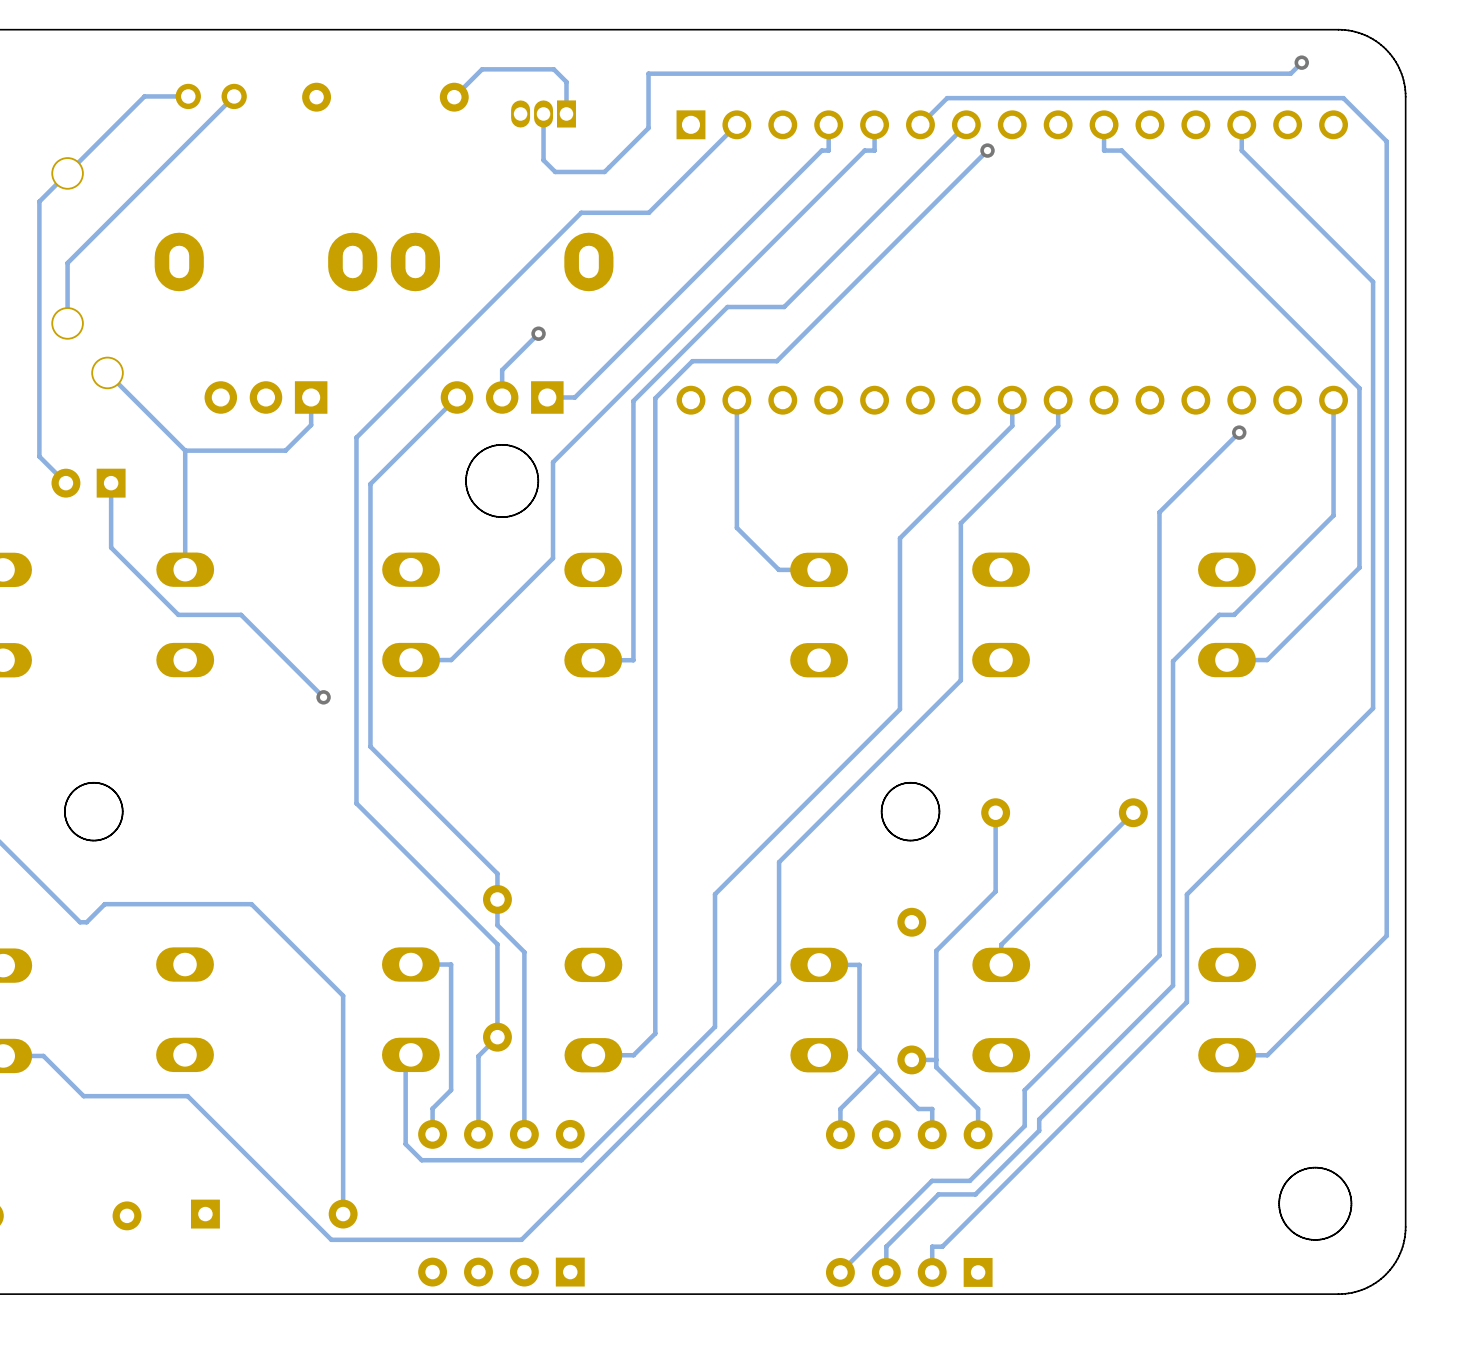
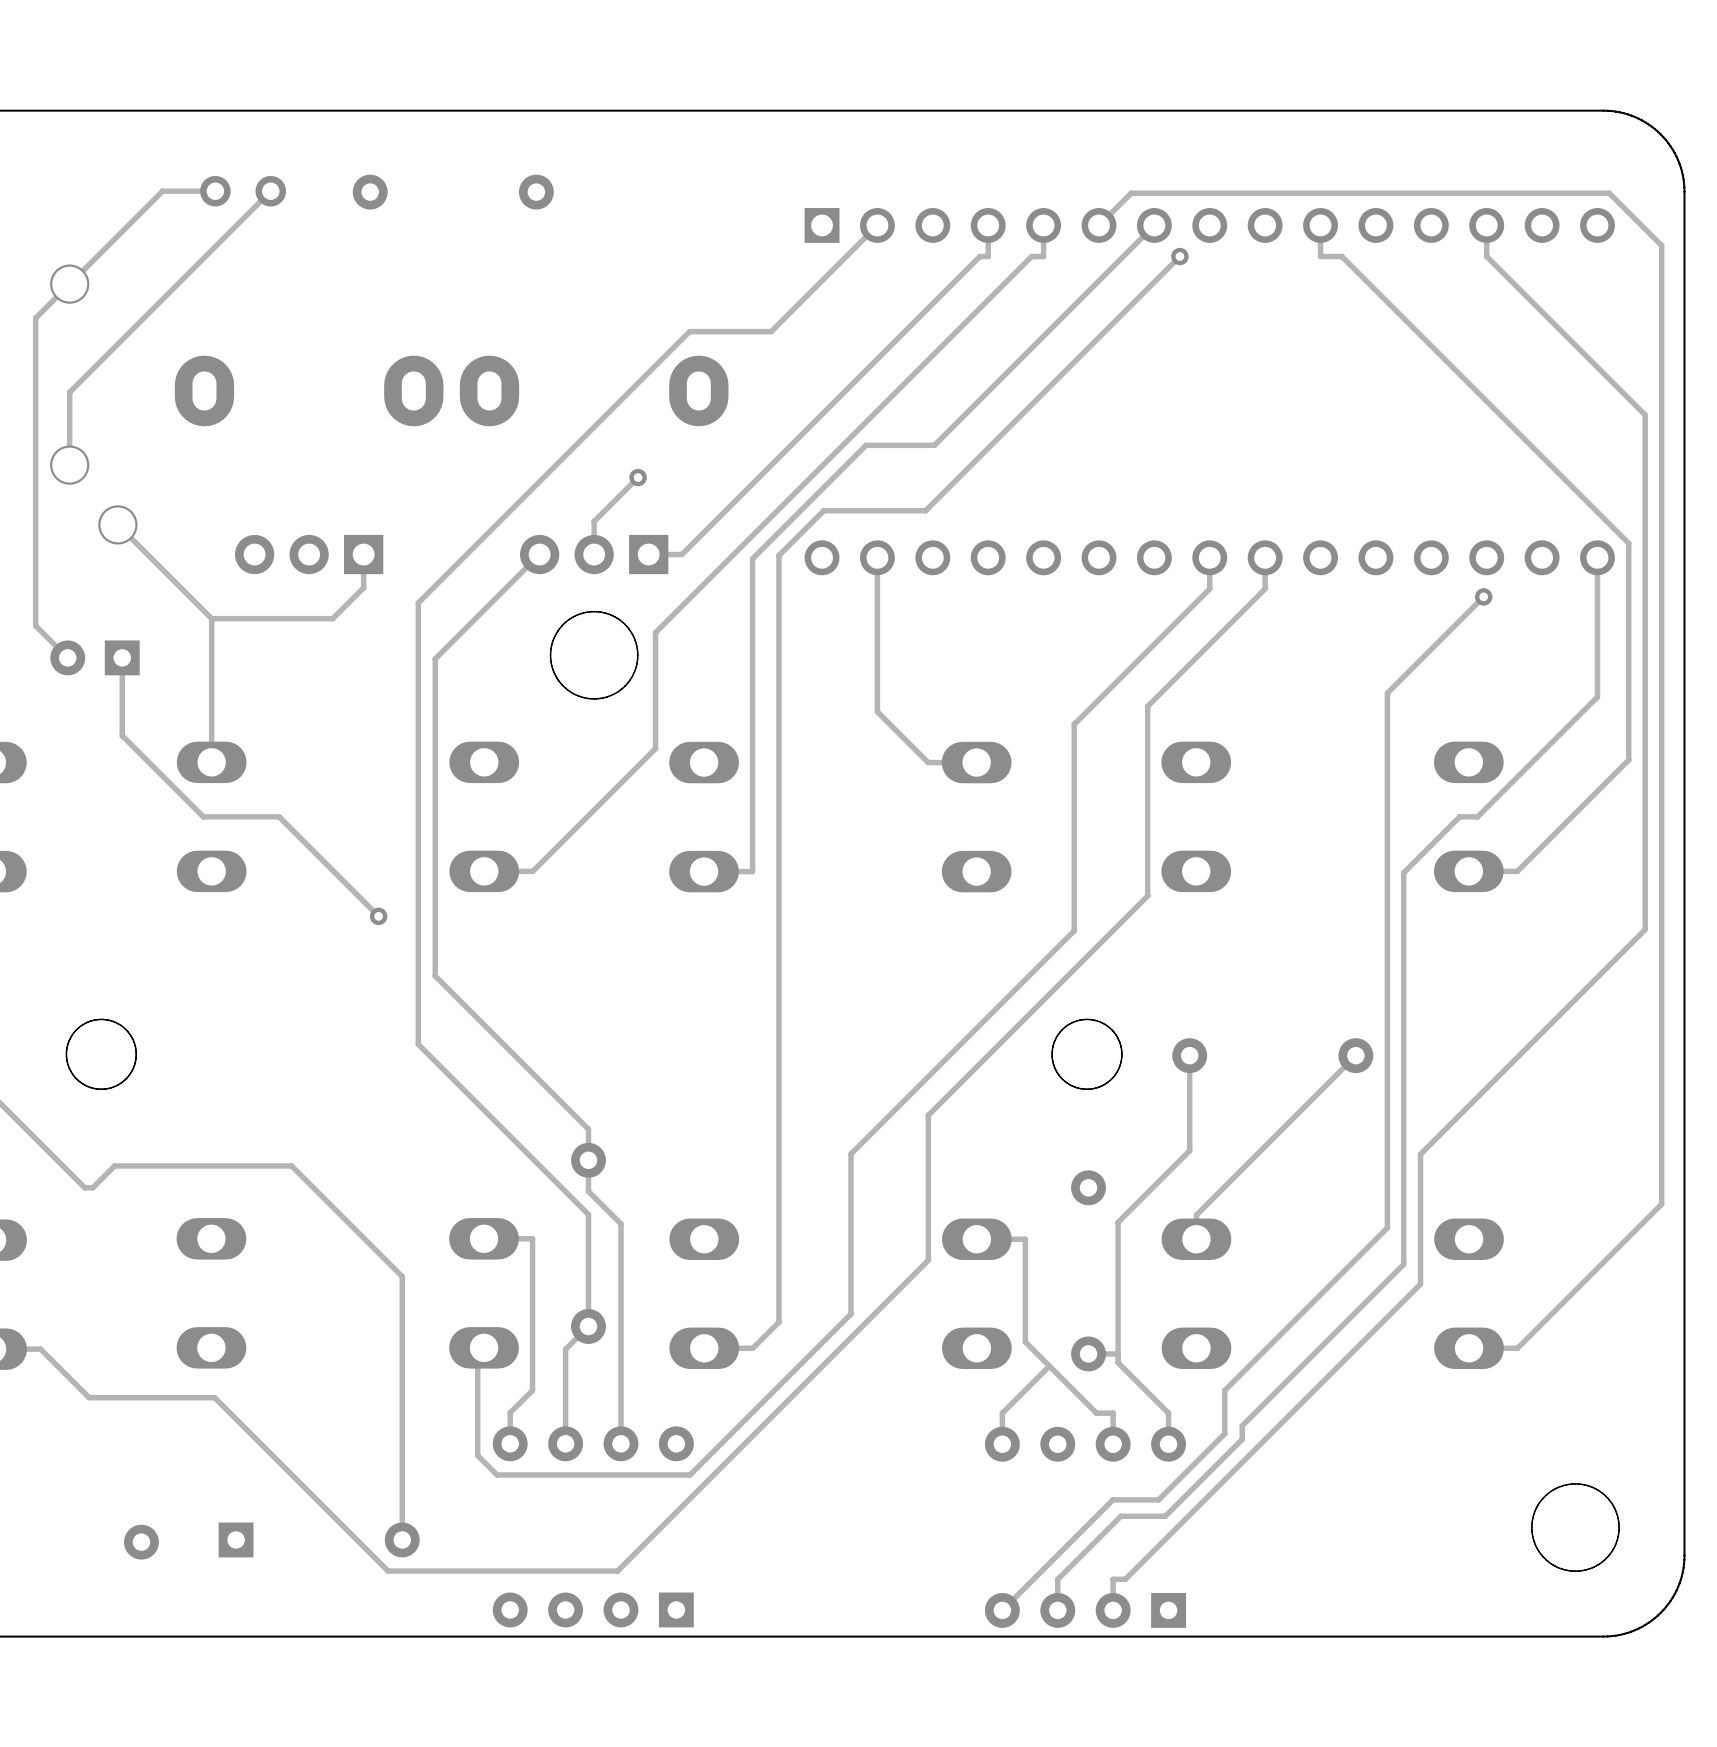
track: (1301, 62) (1290, 73) (648, 73) (648, 128) (604, 171) (555, 171) (543, 160) (543, 113) -> none
via: (1301, 62) -> none
track: (454, 97) (482, 69) (553, 69) (566, 81) (566, 113) -> none
part: (543, 113) -> none

